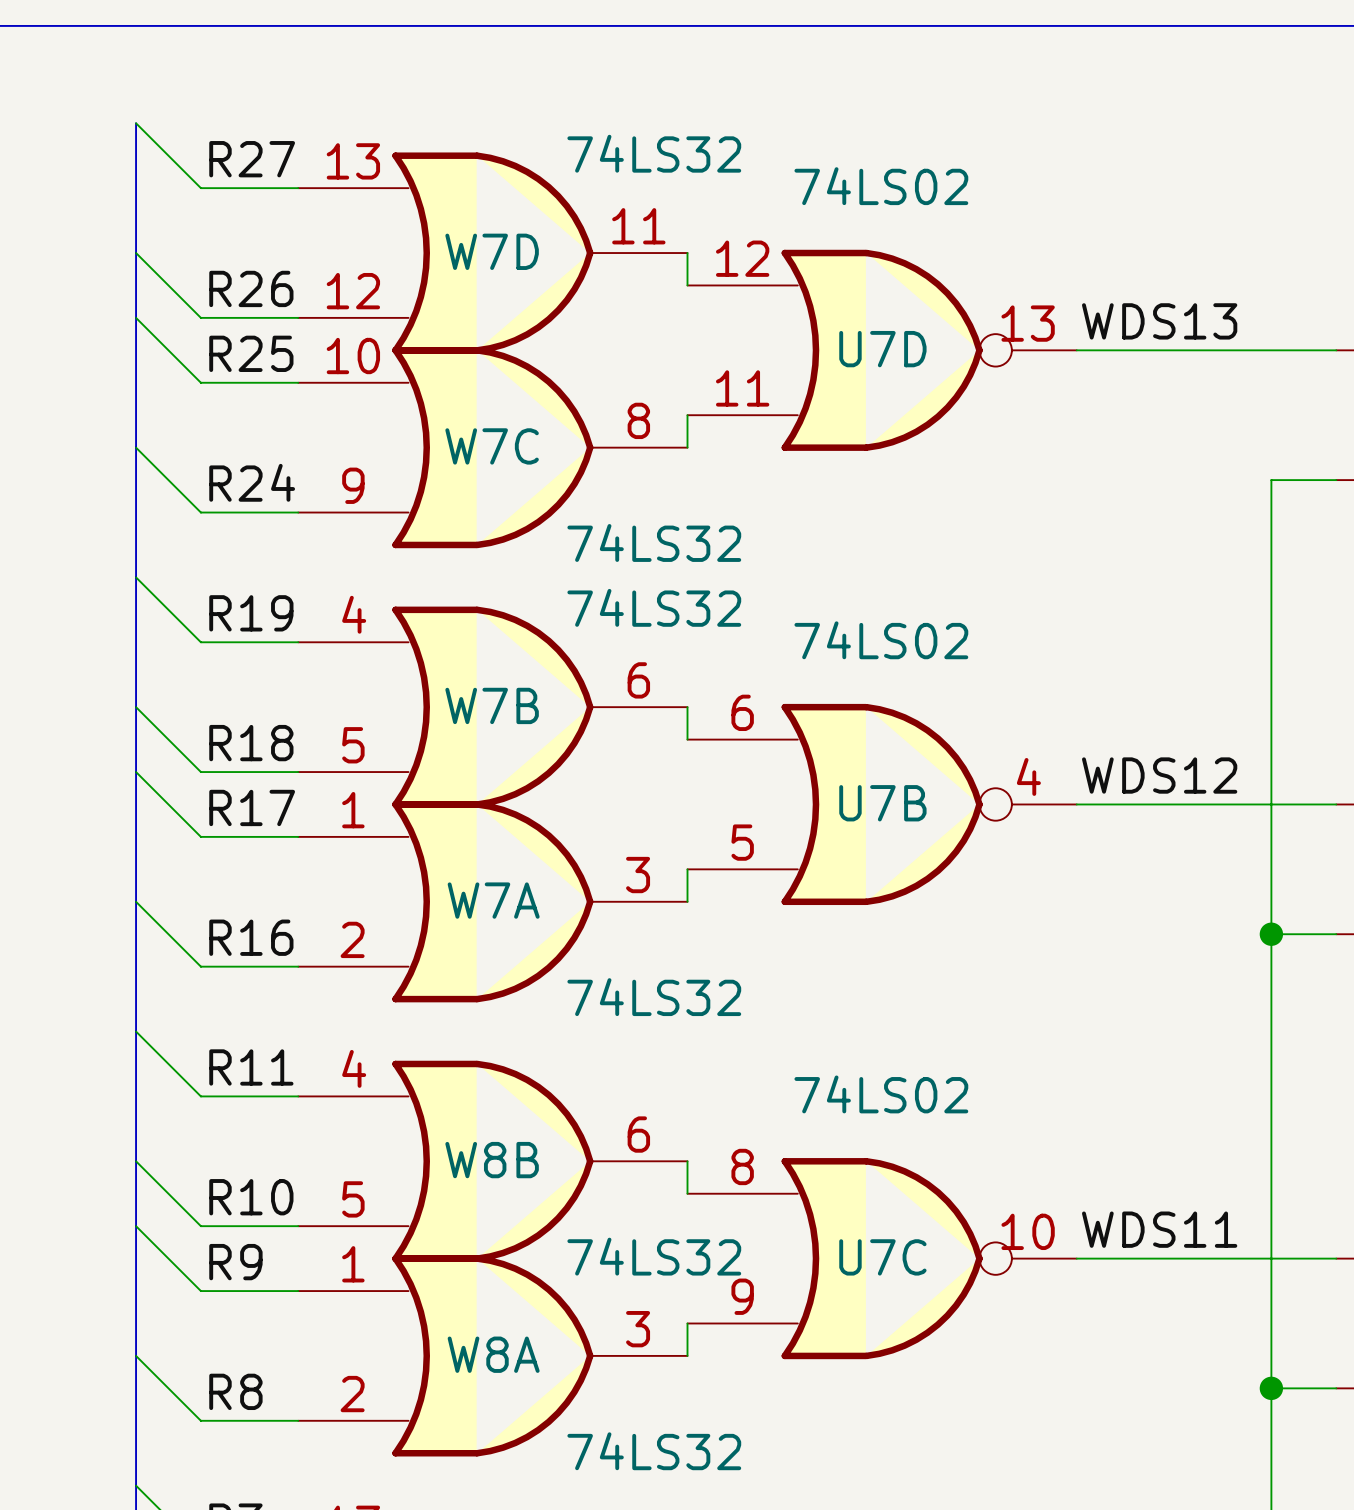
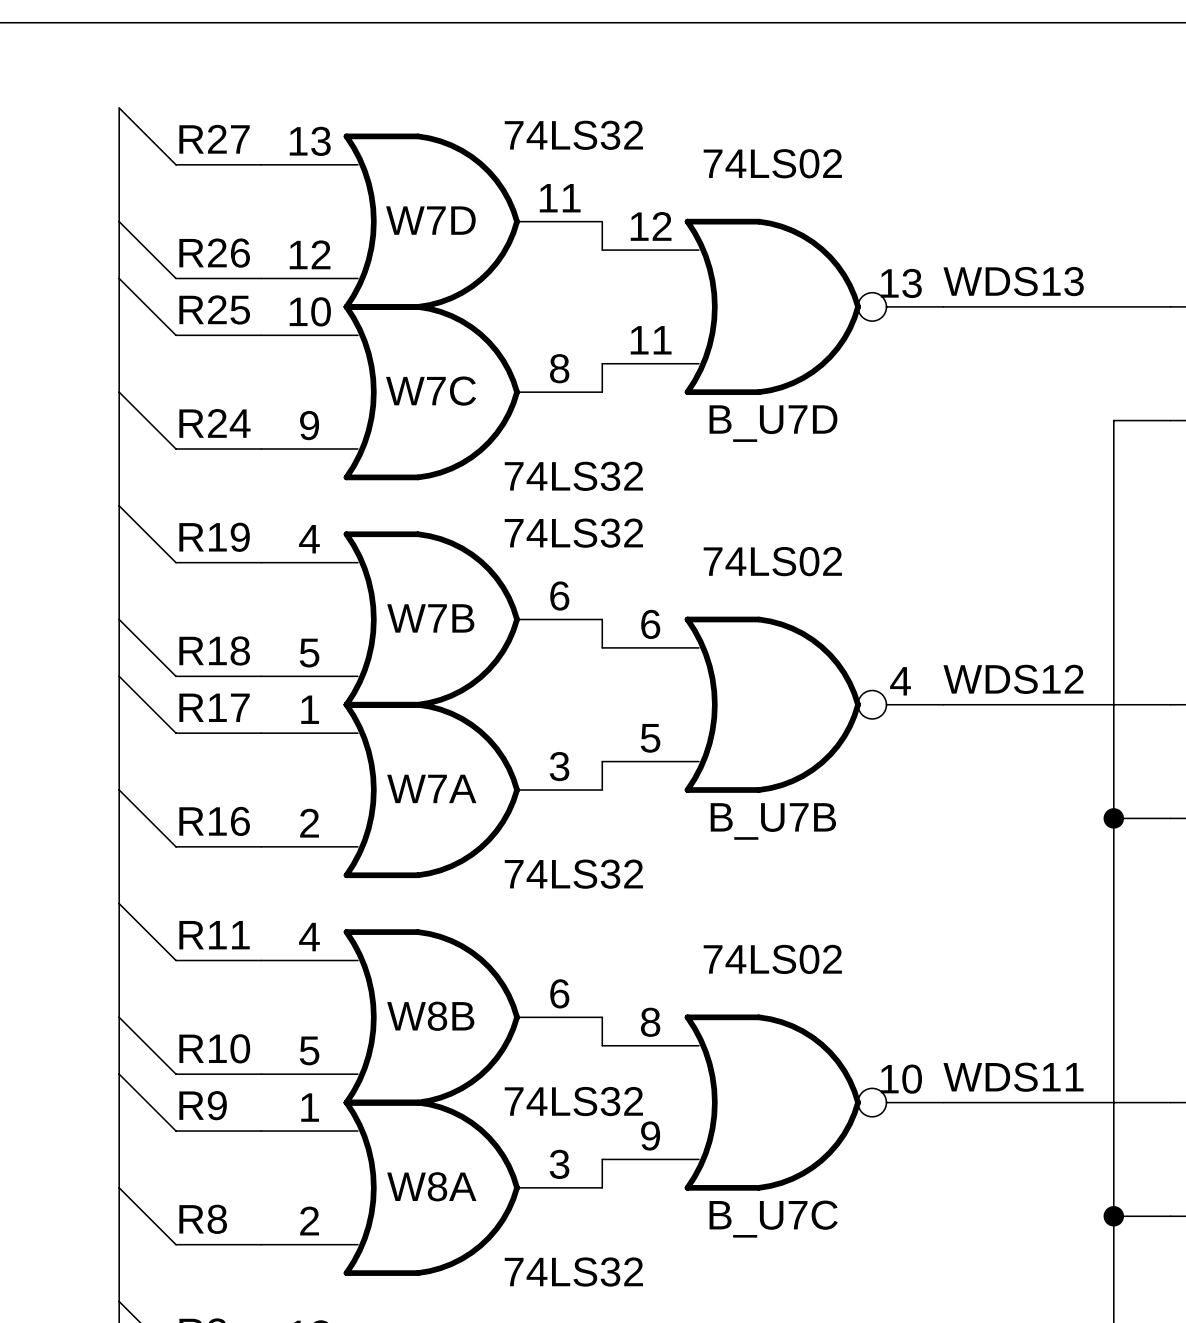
U7D name: U7D (882, 349) -> B_U7D (773, 423)
U7B name: U7B (882, 803) -> B_U7B (773, 821)
U7C name: U7C (882, 1257) -> B_U7C (773, 1219)

